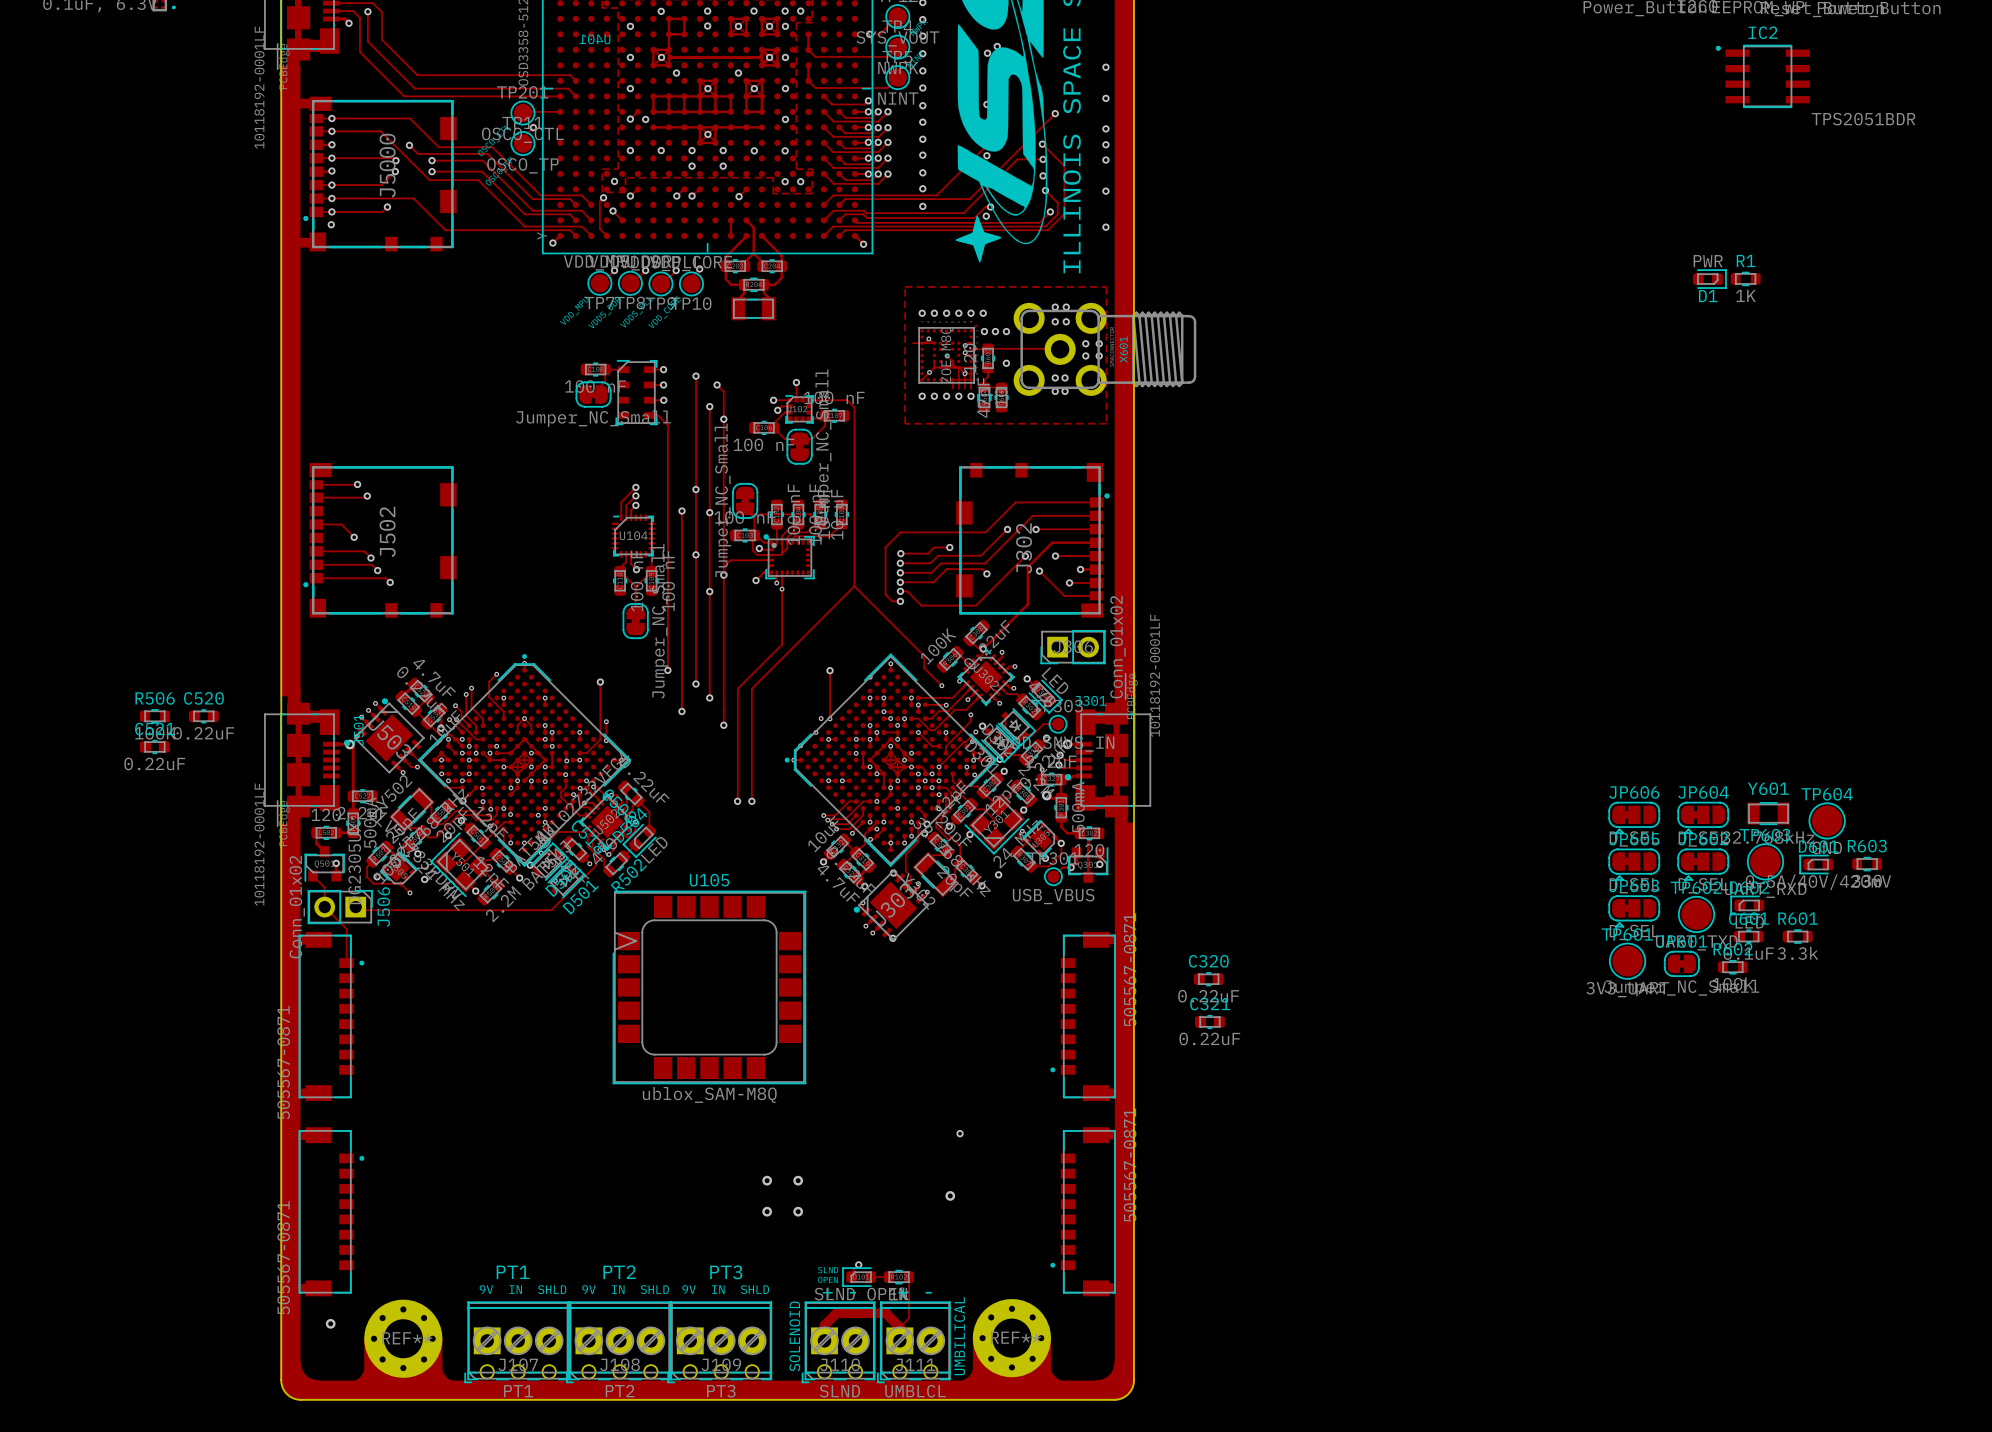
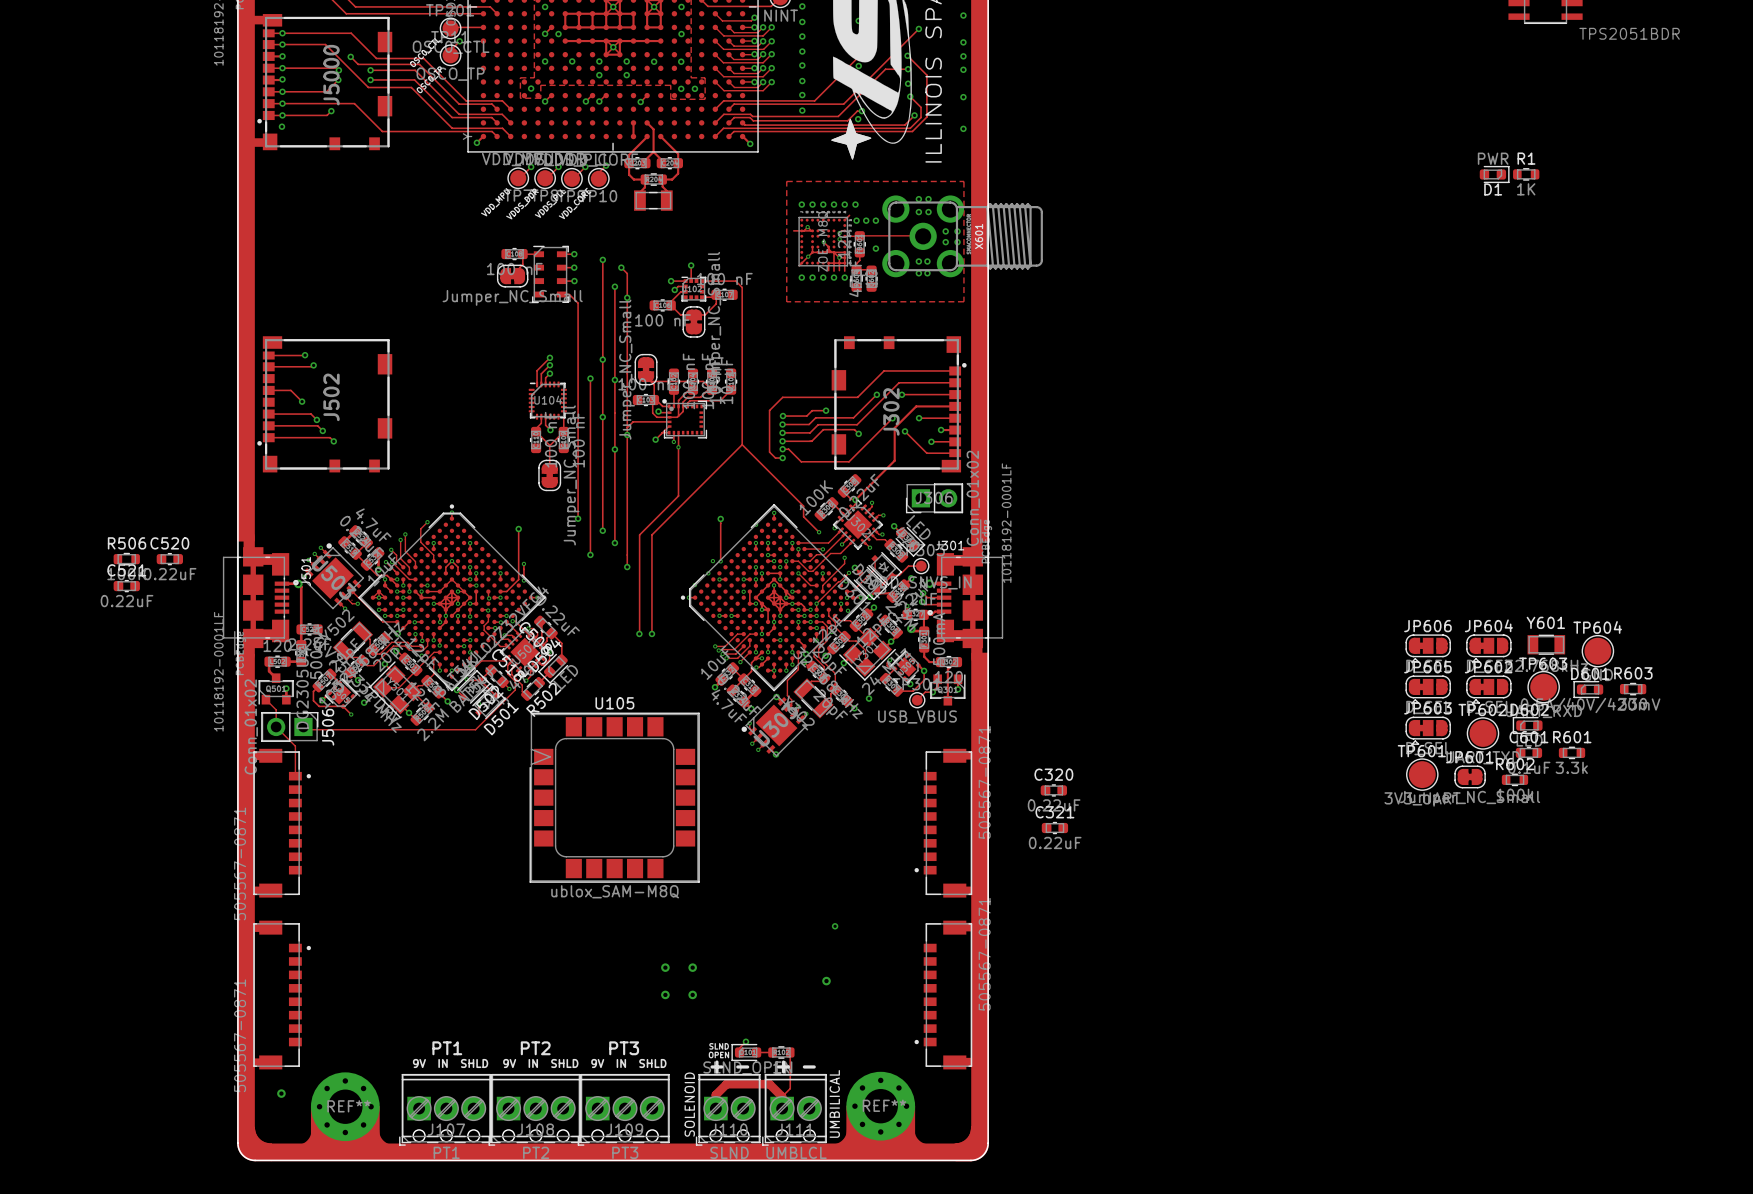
track: (603, 197) (599, 201) (599, 228) (606, 235) -> none
via: (603, 197) -> none
via: (613, 210) -> none
track: (613, 211) (622, 220) -> none

